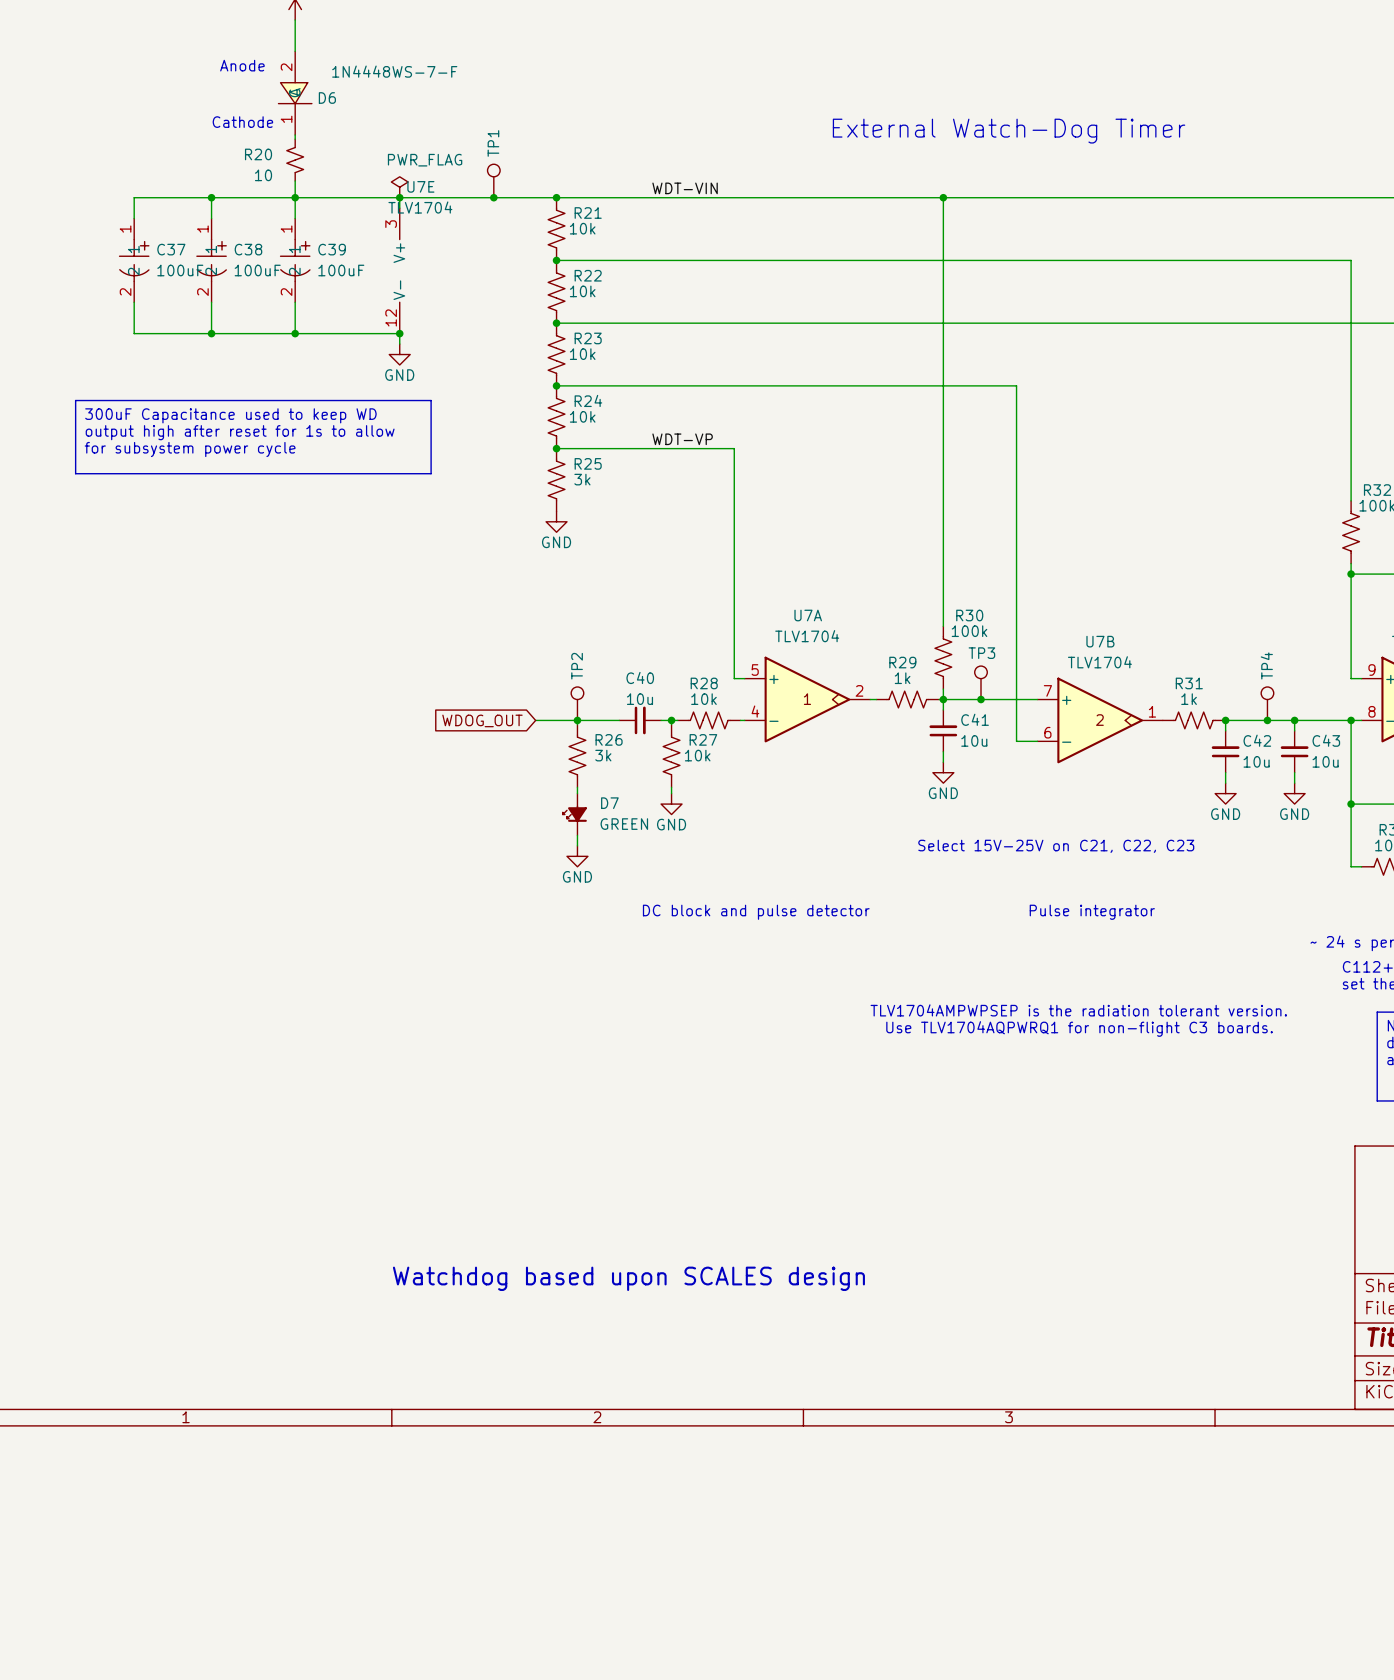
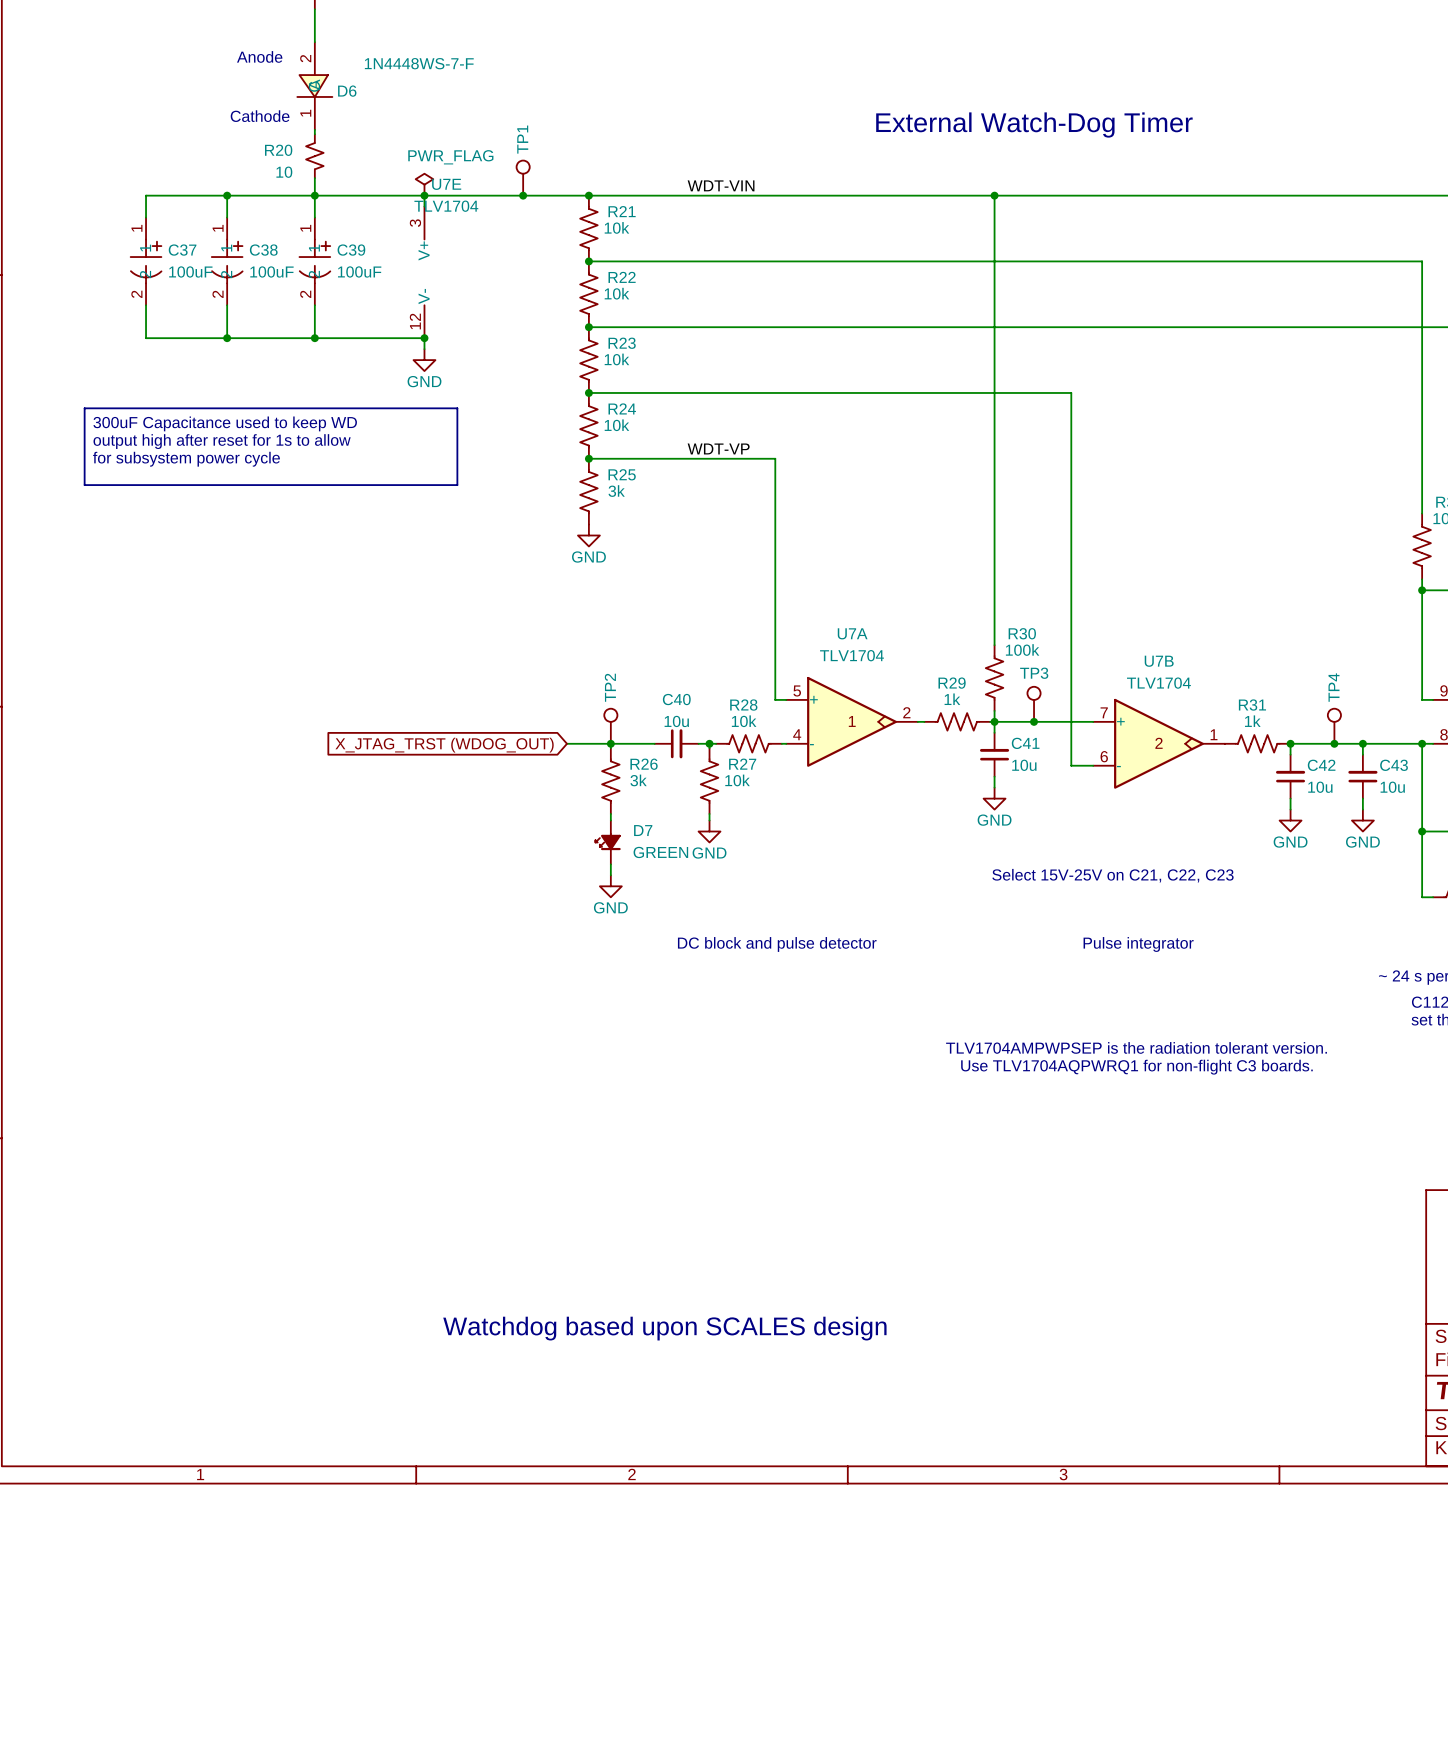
global label: WDOG_OUT (482, 720) -> X_JTAG_TRST (WDOG_OUT) (444, 745)

